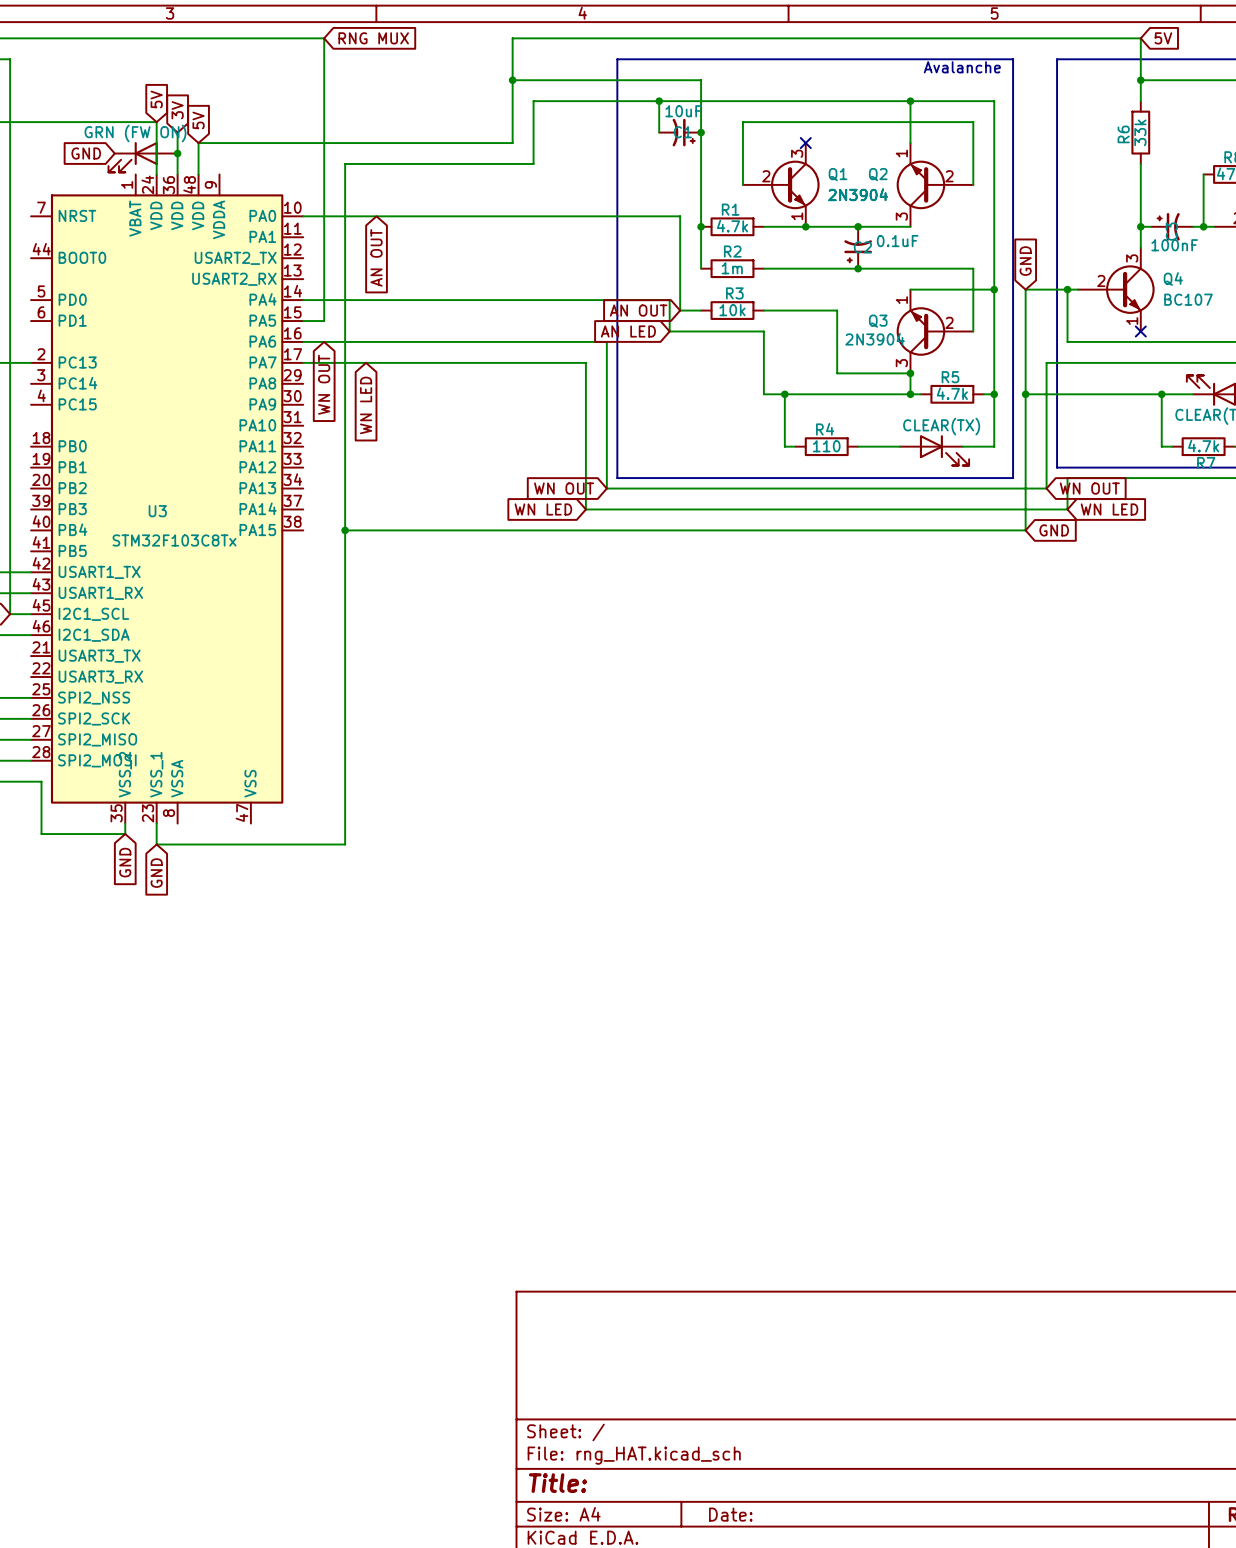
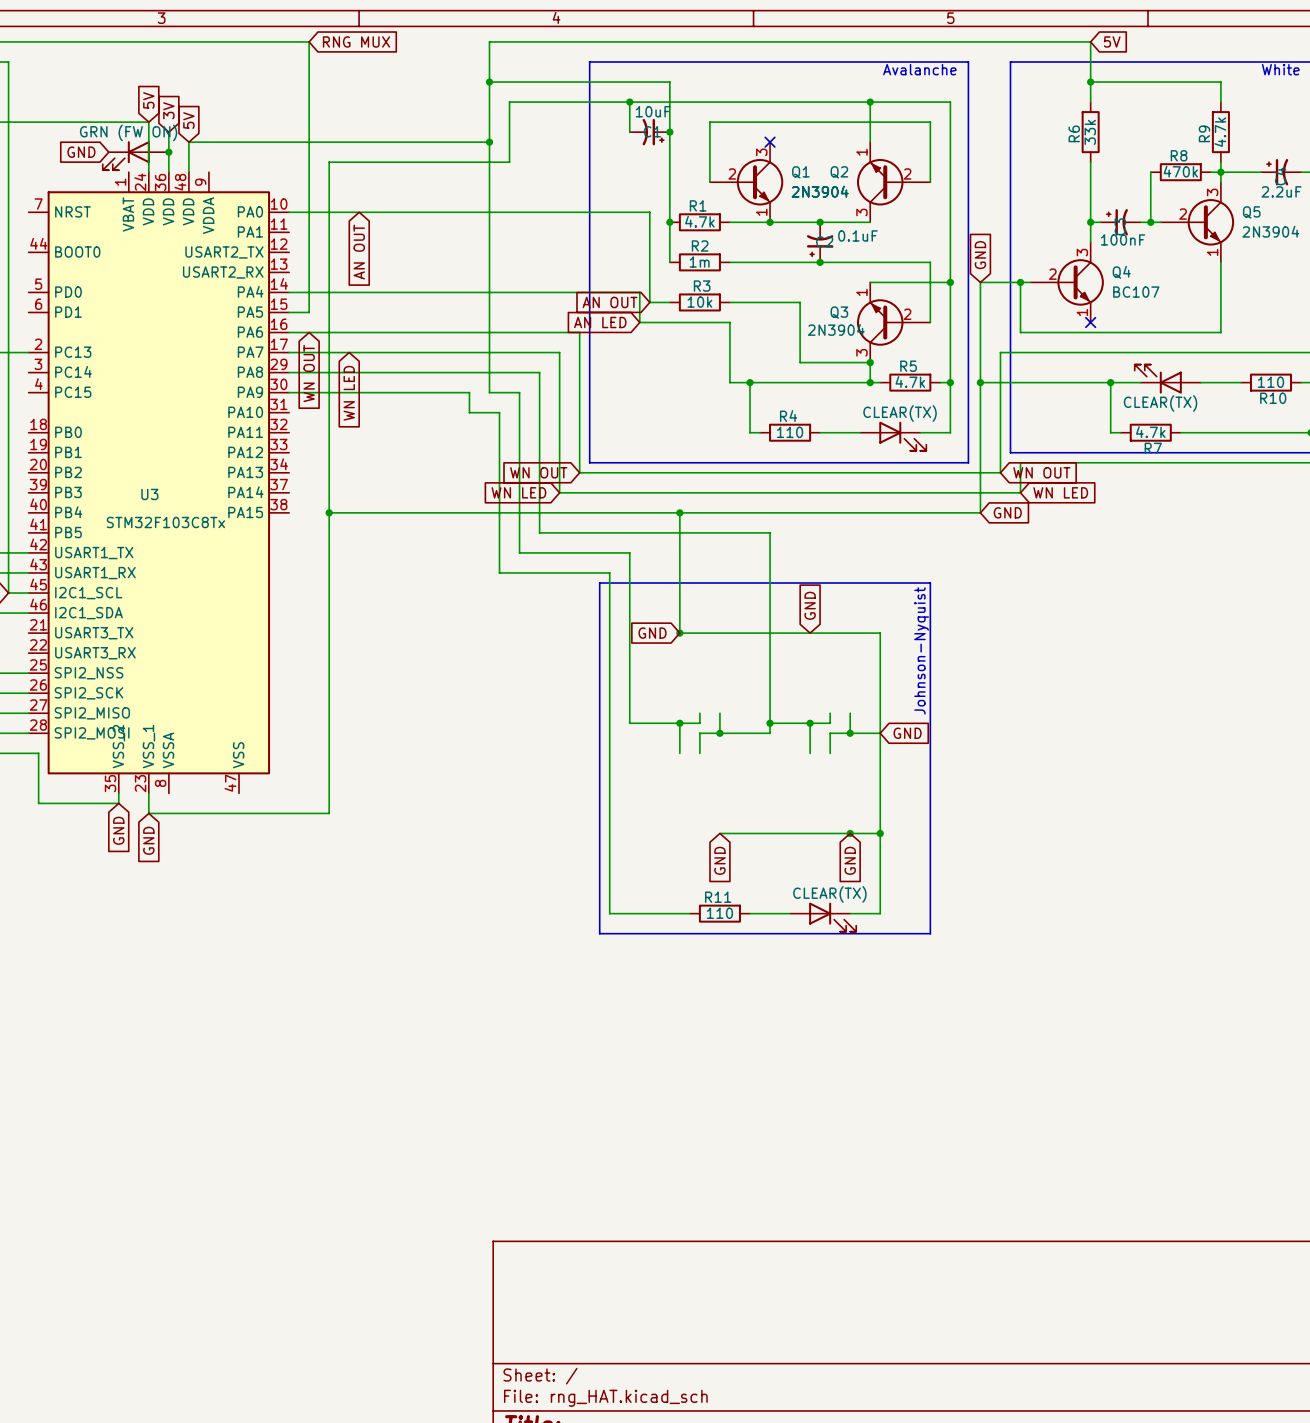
wire: none -> (489, 142) (489, 392) (519, 392) (519, 552) (629, 552) (629, 723) (699, 723) (699, 713)
junction: none -> (489, 142)
wire: none -> (289, 372) (539, 372) (539, 532) (770, 532) (770, 733) (699, 733) (699, 753)
wire: none -> (289, 392) (469, 392) (469, 412) (499, 412) (499, 572) (609, 572) (609, 913) (689, 913)
wire: none -> (679, 512) (679, 633) (880, 633) (880, 913) (850, 913)
junction: none -> (679, 512)
line: none -> (599, 583) (930, 583) (930, 933) (599, 933) (599, 583)
global label: none -> GND (810, 605)
global label: none -> GND (652, 633)
junction: none -> (679, 633)
text: none -> Johnson-Nyquist (921, 650)
wire: none -> (719, 713) (719, 733)
wire: none -> (830, 713) (830, 723) (770, 723)
wire: none -> (850, 713) (850, 733)
wire: none -> (679, 723) (679, 753)
junction: none -> (679, 723)
junction: none -> (770, 723)
wire: none -> (810, 723) (810, 753)
junction: none -> (810, 723)
junction: none -> (719, 733)
junction: none -> (850, 733)
wire: none -> (880, 733) (830, 733) (830, 753)
global label: none -> GND (907, 733)
wire: none -> (719, 833) (880, 833)
junction: none -> (850, 833)
junction: none -> (880, 833)
global label: none -> GND (719, 860)
global label: none -> GND (850, 860)
R11: none -> 110 (719, 913)
wire: none -> (749, 913) (790, 913)
part: none -> CLEAR(TX) (823, 917)

